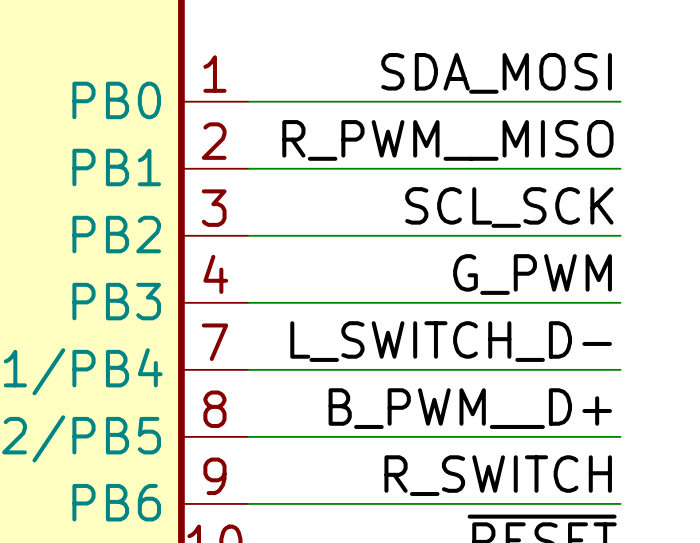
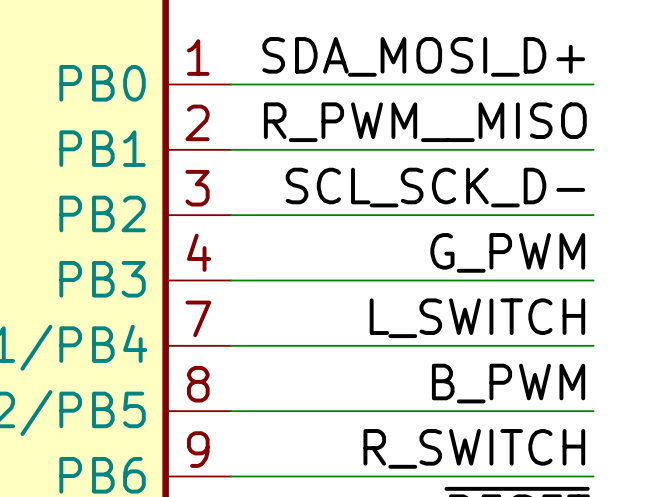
label: SDA_MOSI (496, 73) -> SDA_MOSI_D+ (423, 56)
label: SCL_SCK (509, 207) -> SCL_SCK_D- (435, 187)
label: L_SWITCH_D- (451, 341) -> L_SWITCH (477, 318)
label: B_PWM__D+ (470, 408) -> B_PWM (508, 383)

